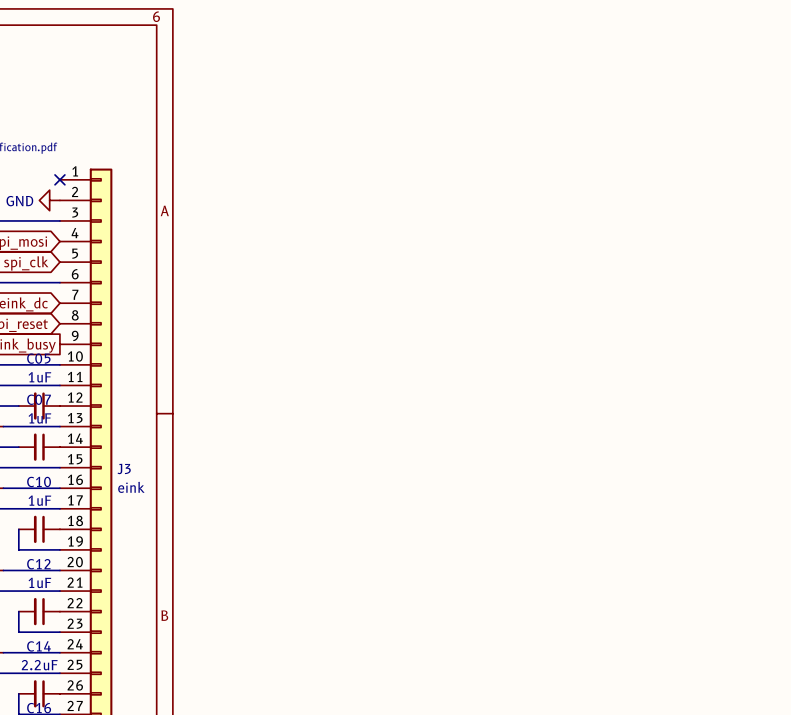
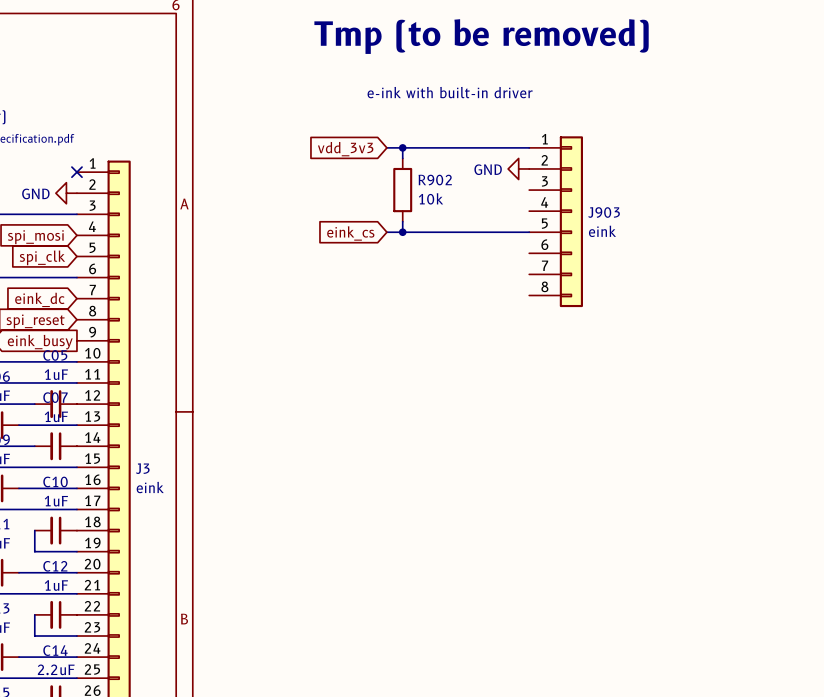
text: none -> Tmp (to be removed) (481, 36)
text: none -> e-ink with built-in driver (450, 92)
wire: none -> (386, 147) (529, 147)
wire: none -> (402, 147) (402, 158)
junction: none -> (402, 147)
global label: none -> vdd_3v3 (345, 149)
power symbol: none -> GND (518, 168)
R902: none -> 10k (402, 190)
wire: none -> (402, 221) (402, 232)
J903: none -> eink (556, 221)
wire: none -> (386, 232) (529, 232)
junction: none -> (402, 232)
global label: none -> eink_cs (350, 233)

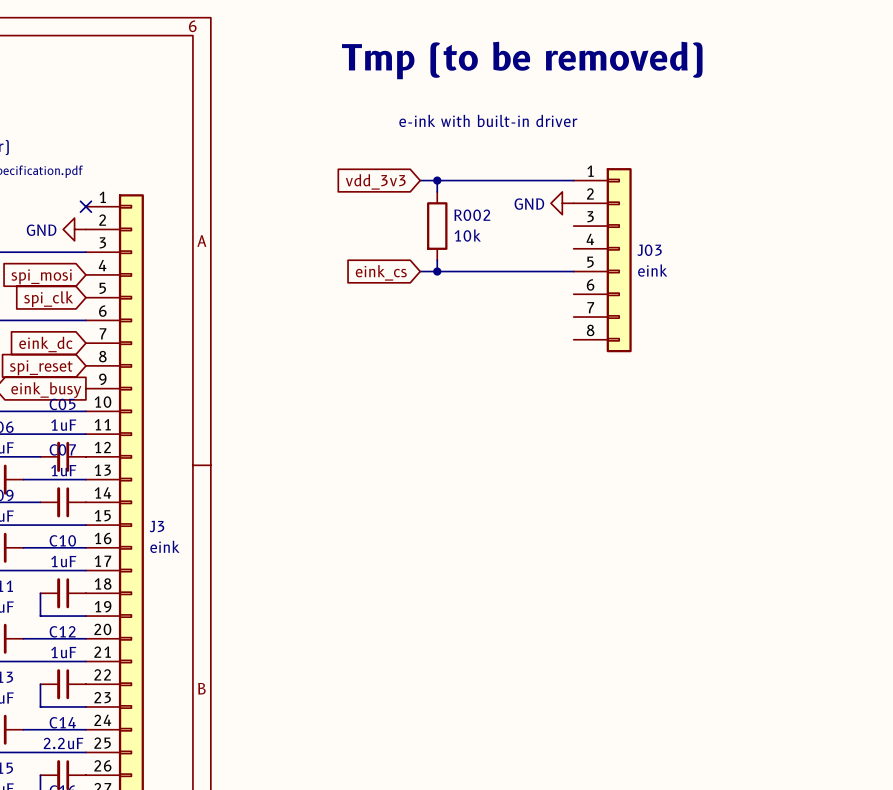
R902 name: R902 (435, 180) -> R002 (472, 215)
J903 name: J903 (604, 212) -> J03 (649, 250)

